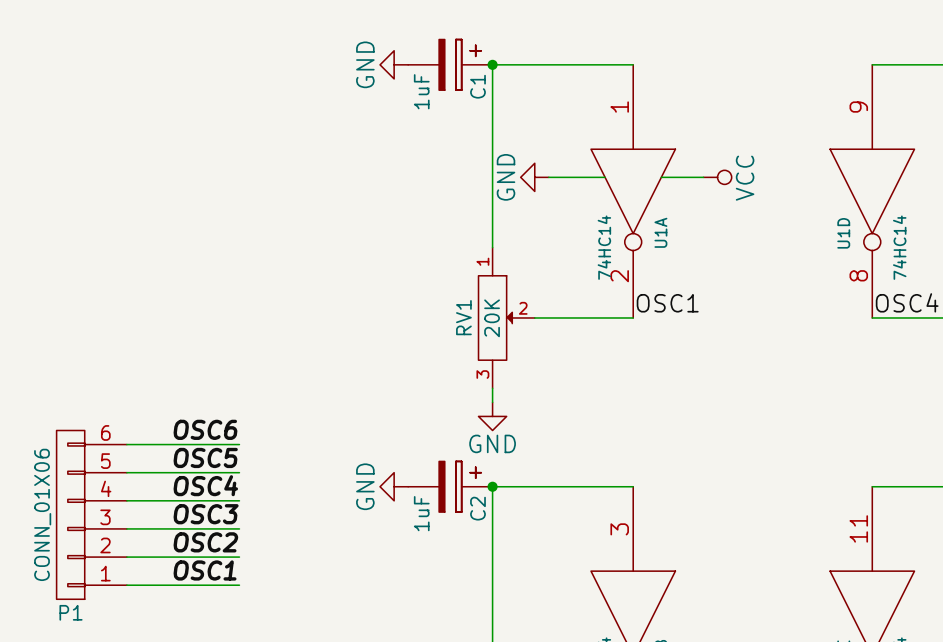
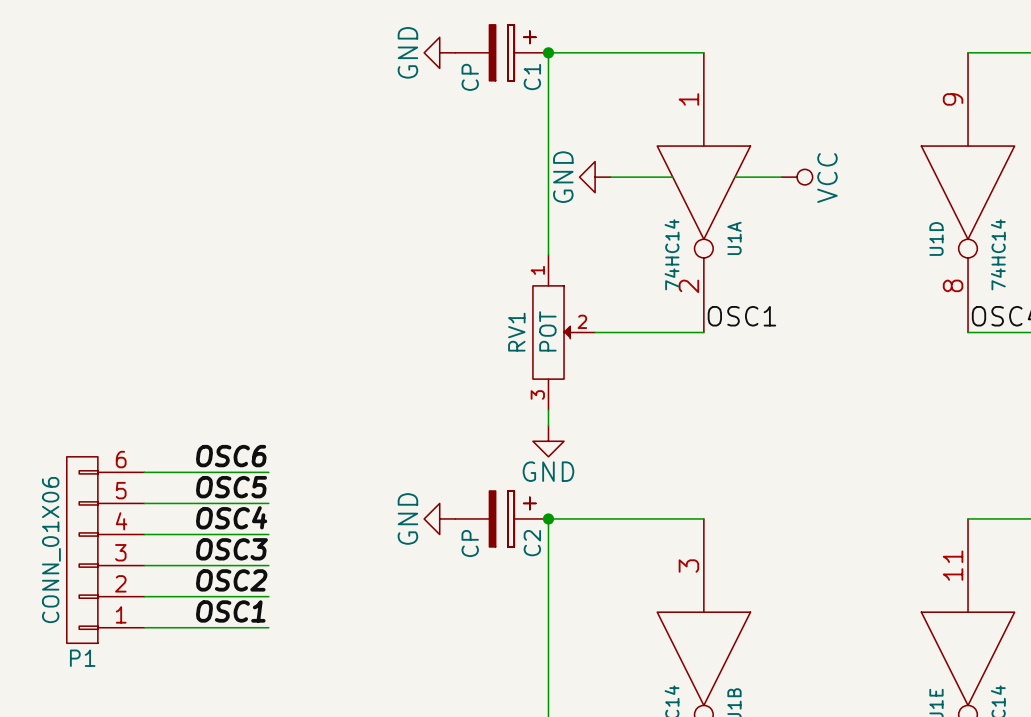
C1 value: 1uF (421, 91) -> CP (470, 77)
RV1 value: 20K (492, 318) -> POT (547, 331)
C2 value: 1uF (421, 513) -> CP (470, 543)

